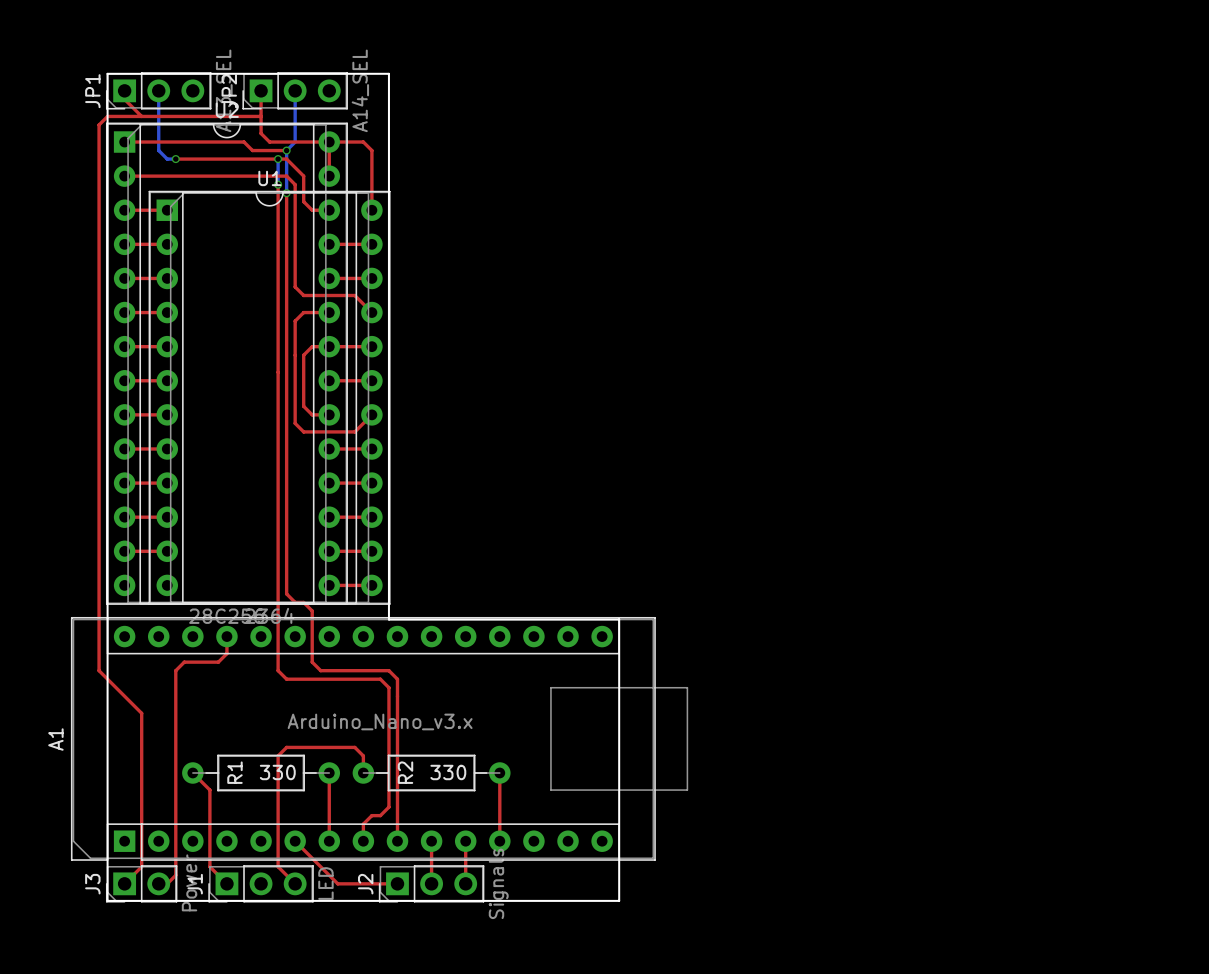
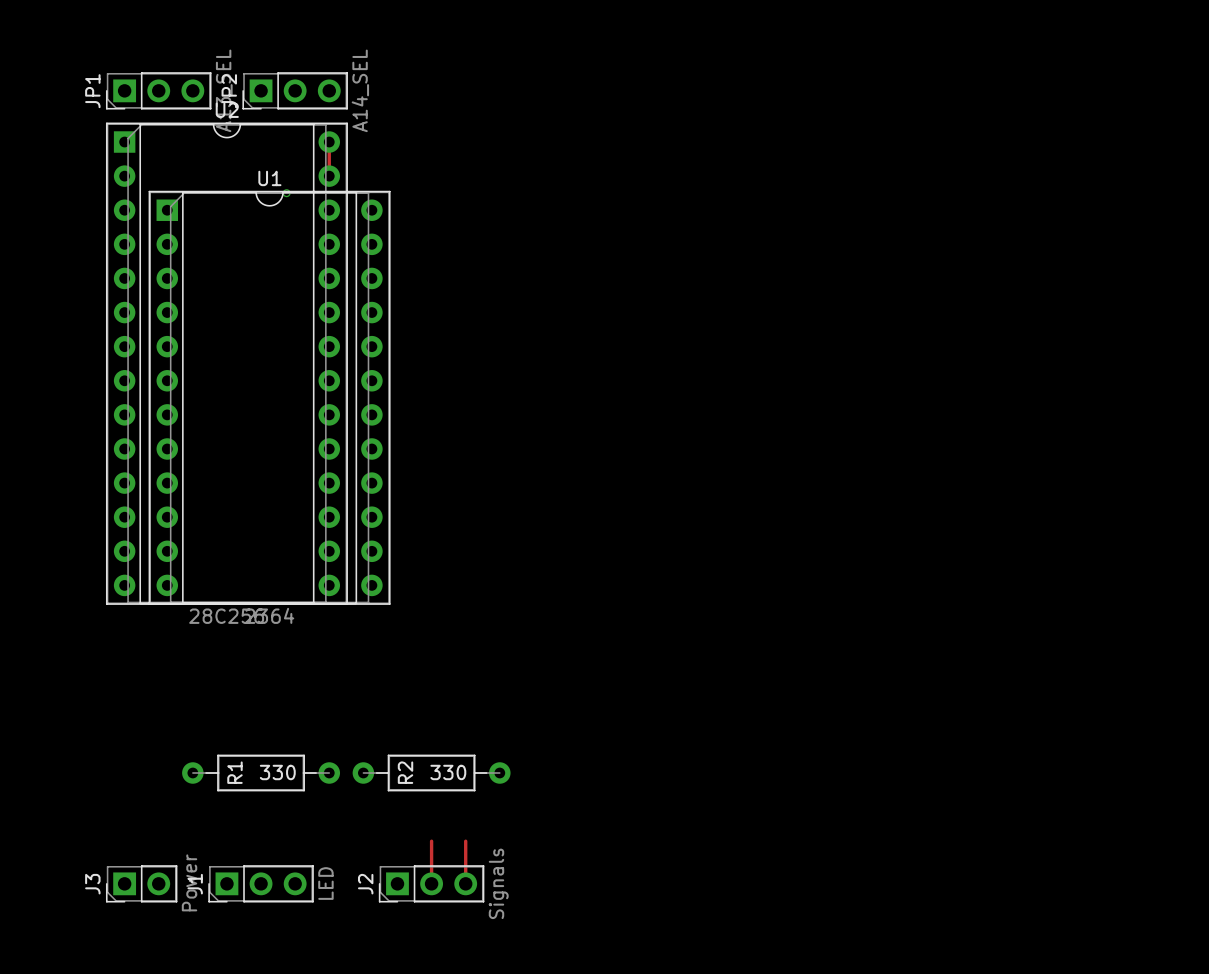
board edge: (107, 73) (107, 900) (619, 900) (619, 619) (388, 619) (388, 73) (107, 73) -> none
top track: (124, 90) (124, 99) (141, 116) -> none
bottom track: (158, 90) (158, 150) (167, 159) (175, 159) -> none
top track: (261, 90) (261, 133) (269, 142) (363, 142) (371, 150) (371, 210) -> none
bottom track: (295, 90) (295, 142) (286, 150) (286, 193) -> none
top track: (261, 116) (107, 116) (99, 124) (99, 670) (141, 713) (141, 866) (124, 883) -> none
top track: (124, 142) (244, 142) (252, 150) (286, 150) -> none
via: (286, 150) -> none
top track: (175, 159) (286, 159) (303, 176) (303, 201) (312, 210) (329, 210) -> none
via: (175, 159) -> none
bottom track: (278, 159) (278, 184) -> none
via: (278, 159) -> none
top track: (124, 176) (286, 176) (295, 184) (295, 286) (303, 295) (354, 295) (371, 312) -> none
top track: (278, 184) (278, 670) (286, 679) (380, 679) (388, 687) (388, 807) (380, 815) (371, 815) (363, 824) (363, 841) -> none
via: (278, 184) -> none
top track: (286, 193) (286, 593) (295, 602) (303, 602) (312, 610) (312, 662) (320, 670) (388, 670) (397, 679) (397, 841) -> none
top track: (124, 210) (167, 210) -> none
top track: (124, 244) (167, 244) -> none
top track: (329, 244) (371, 244) -> none
top track: (124, 278) (167, 278) -> none
top track: (329, 278) (371, 278) -> none
top track: (124, 312) (167, 312) -> none
top track: (329, 312) (303, 312) (295, 321) (295, 423) (303, 431) (354, 431) (371, 414) -> none
top track: (124, 346) (167, 346) -> none
top track: (371, 346) (312, 346) (303, 355) (303, 406) (312, 414) (329, 414) -> none
top track: (124, 380) (167, 380) -> none
top track: (329, 380) (371, 380) -> none
top track: (124, 414) (167, 414) -> none
top track: (124, 448) (167, 448) -> none
top track: (329, 448) (371, 448) -> none
top track: (124, 483) (167, 483) -> none
top track: (329, 483) (371, 483) -> none
top track: (124, 517) (167, 517) -> none
top track: (329, 517) (371, 517) -> none
top track: (124, 551) (167, 551) -> none
top track: (329, 551) (371, 551) -> none
top track: (329, 585) (371, 585) -> none
top track: (226, 636) (226, 653) (218, 662) (184, 662) (175, 670) (175, 875) (167, 883) (158, 883) -> none
A1: Arduino_Nano_v3.x (379, 738) -> none
top track: (192, 773) (209, 790) (209, 866) (226, 883) -> none
top track: (329, 773) (329, 841) -> none
top track: (363, 773) (363, 755) (354, 747) (286, 747) (278, 755) (278, 866) (295, 883) -> none
top track: (499, 773) (499, 841) -> none
top track: (295, 841) (337, 883) (397, 883) -> none

